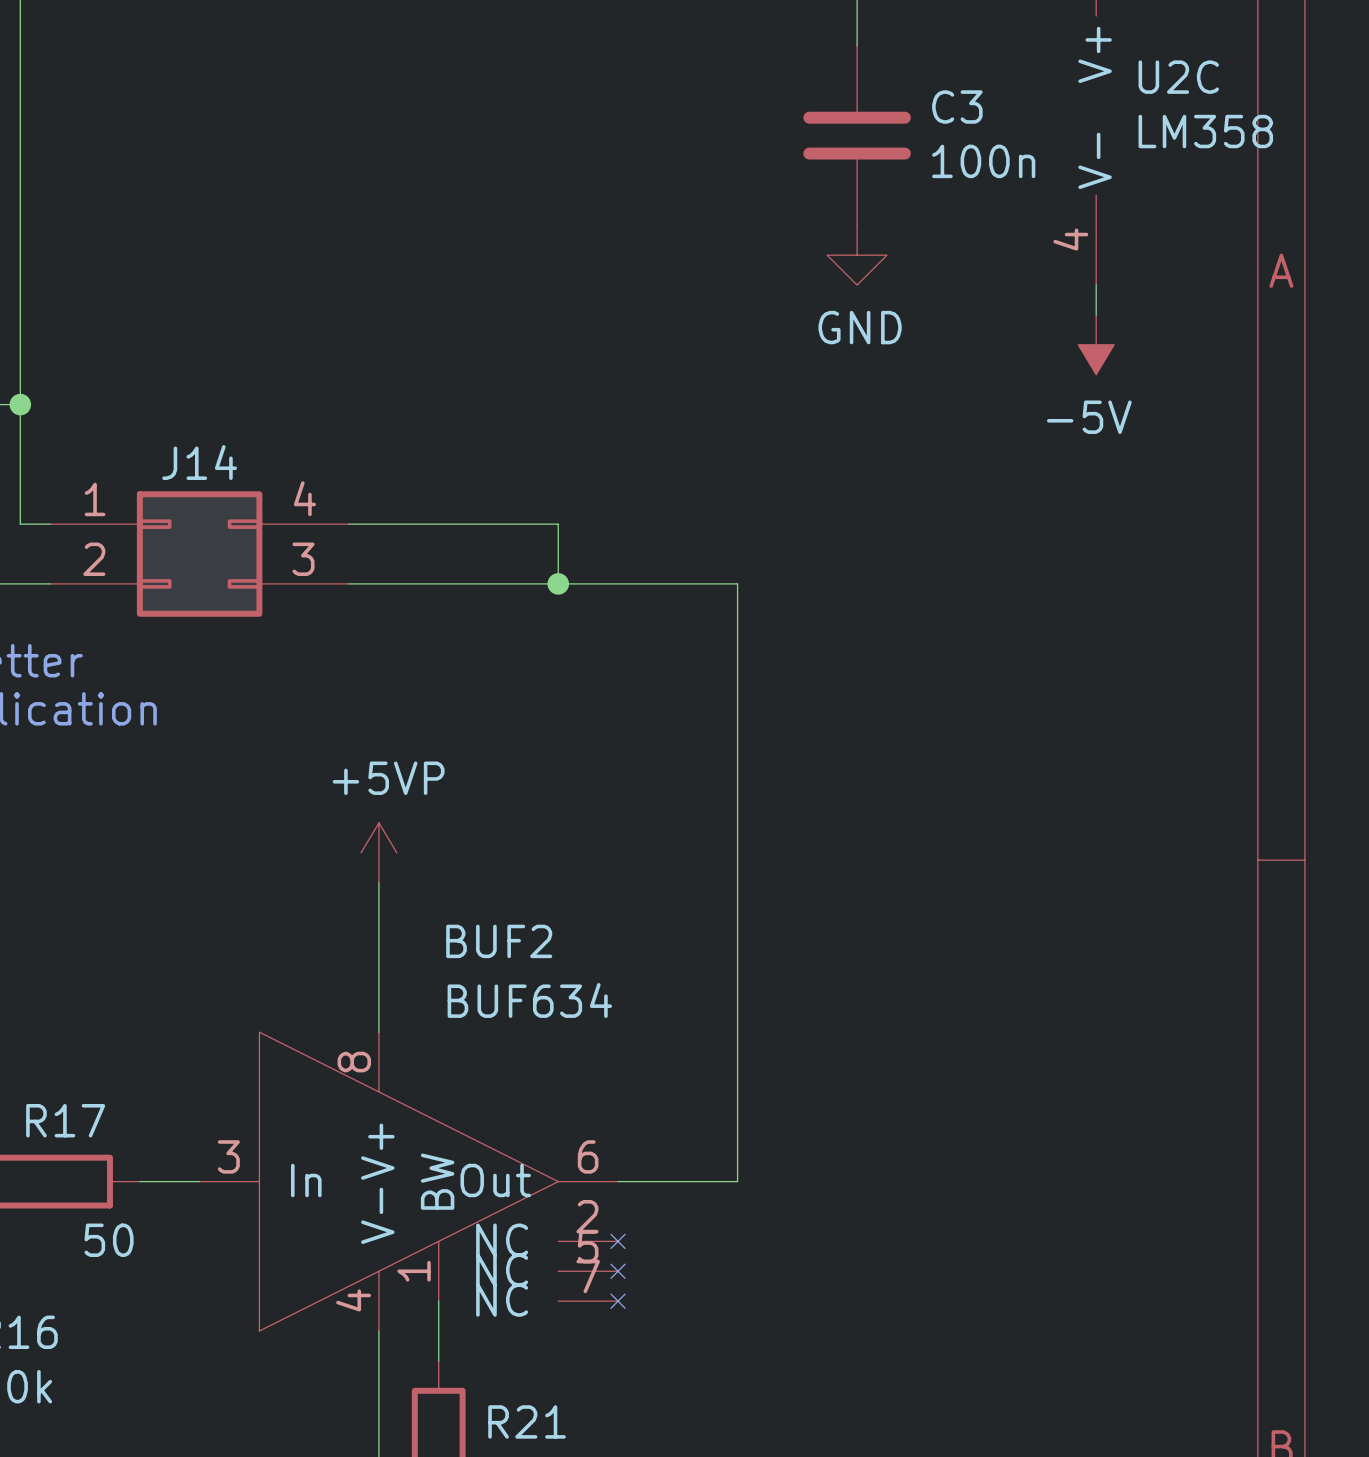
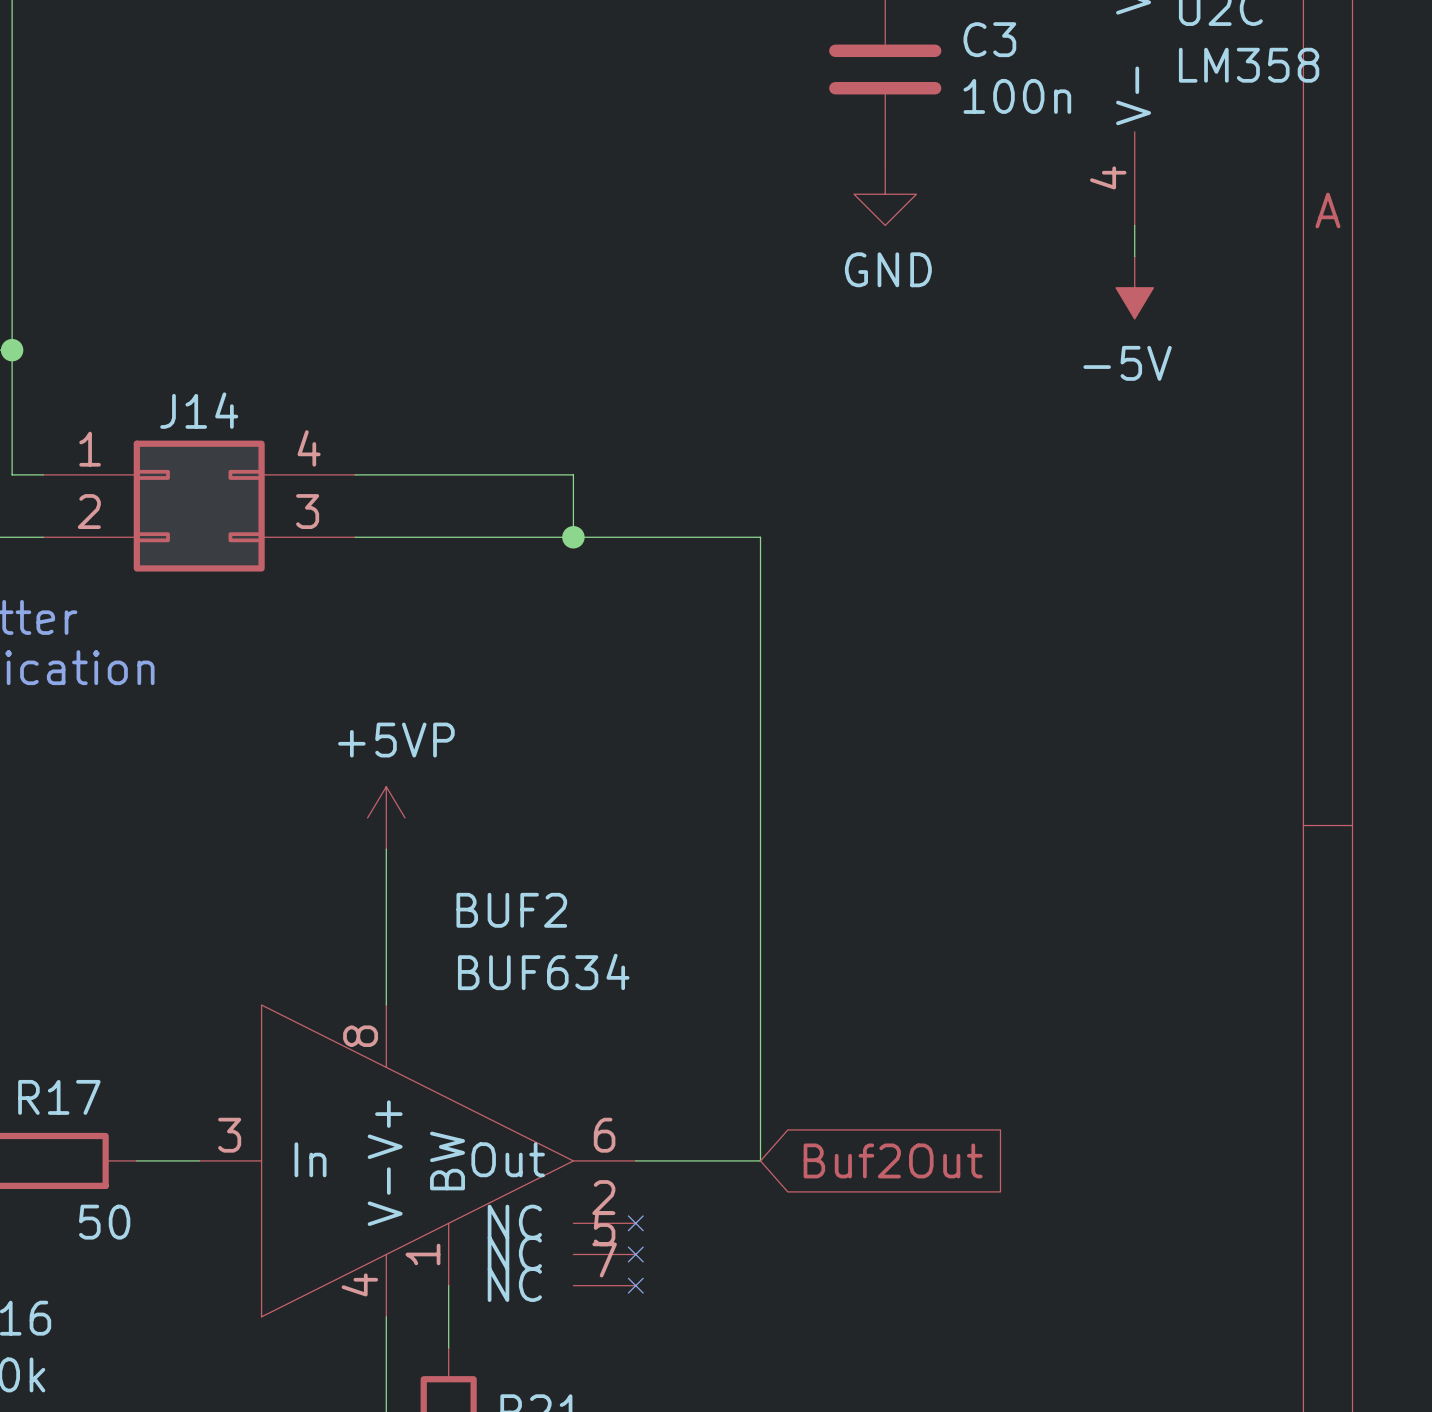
global label: none -> Buf2Out (893, 1160)

